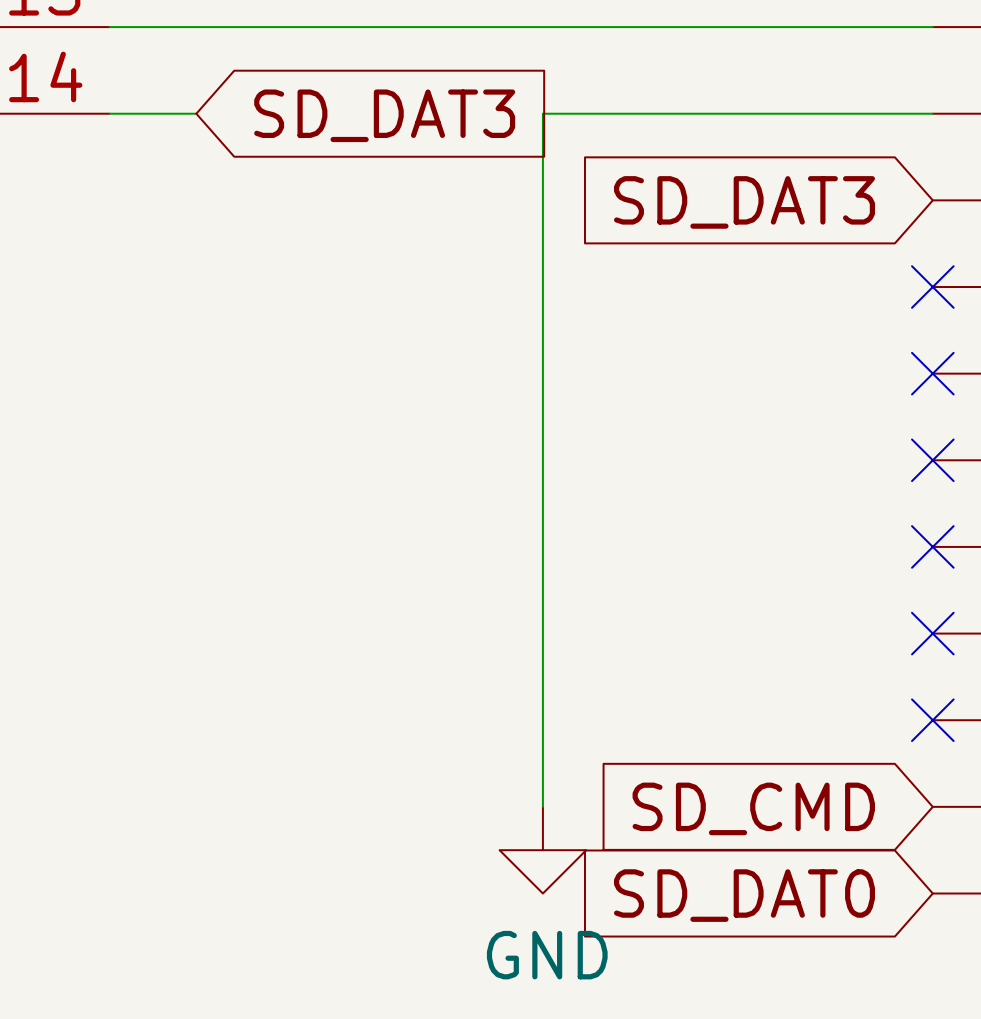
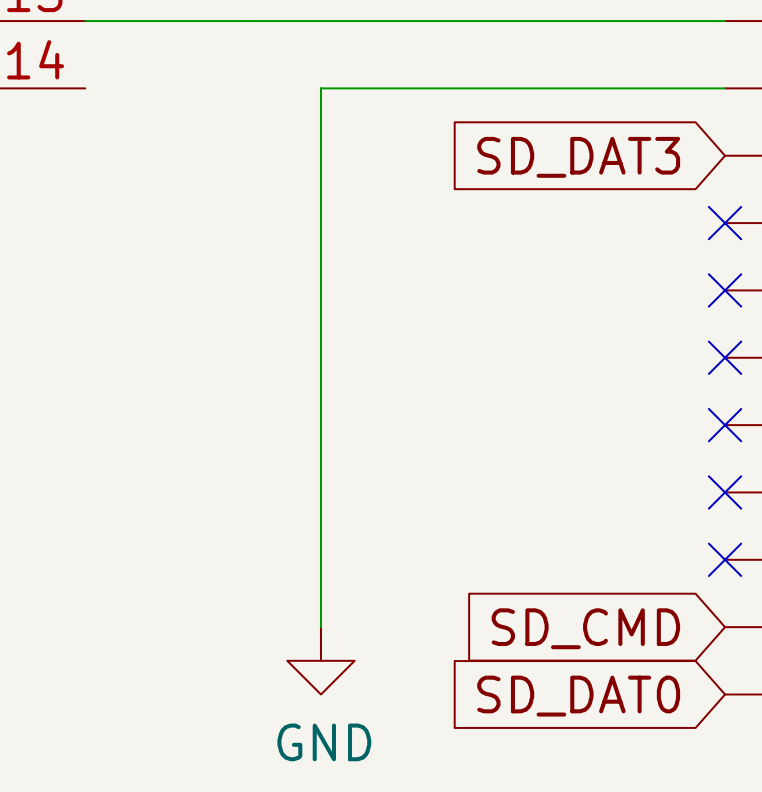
wire: (109, 113) (196, 113) -> none
wire: (542, 113) (542, 806) -> (422, 88) (320, 88) (320, 627)
global label: SD_DAT3 (384, 115) -> none
power symbol position: GND (542, 850) -> GND (320, 660)

